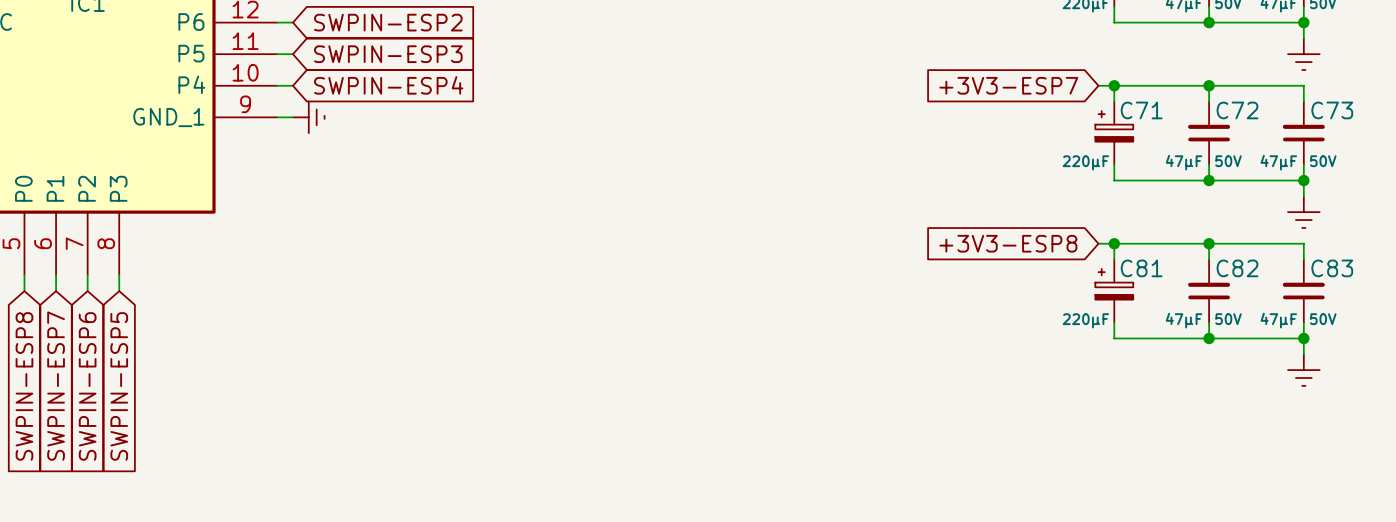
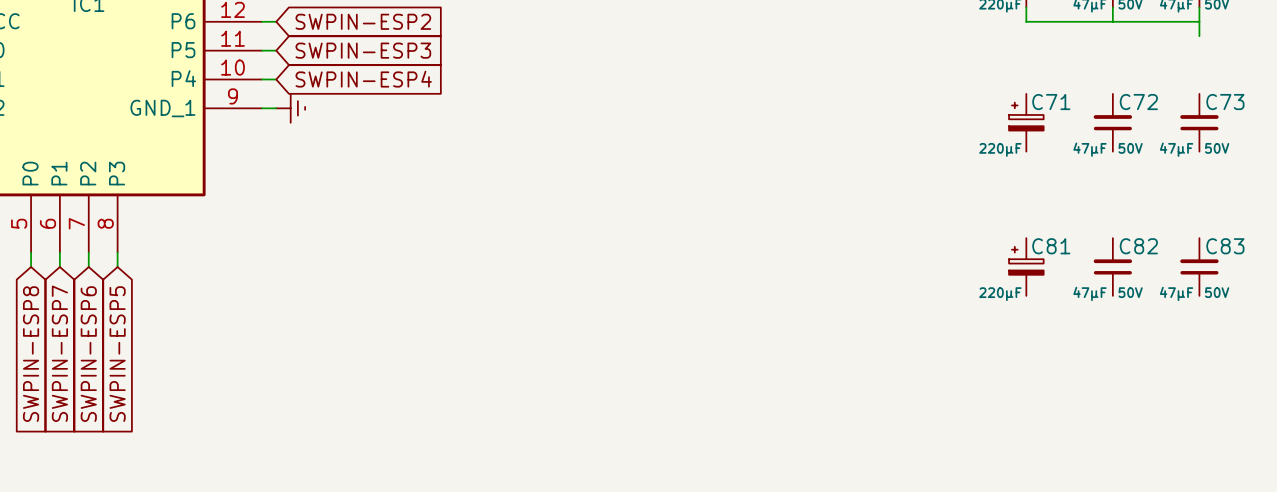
junction: (1209, 22) -> none
junction: (1303, 22) -> none
power symbol: (1303, 54) -> none
global label: +3V3-ESP7 (1008, 85) -> none
wire: (1098, 85) (1303, 85) (1303, 101) -> none
wire: (1114, 85) (1114, 101) -> none
junction: (1114, 85) -> none
wire: (1209, 85) (1209, 101) -> none
junction: (1209, 85) -> none
wire: (1114, 164) (1114, 180) (1303, 180) -> none
wire: (1209, 164) (1209, 180) -> none
wire: (1303, 164) (1303, 196) -> none
junction: (1209, 180) -> none
junction: (1303, 180) -> none
power symbol: (1303, 212) -> none
global label: +3V3-ESP8 (1008, 243) -> none
wire: (1098, 243) (1303, 243) (1303, 259) -> none
wire: (1114, 243) (1114, 259) -> none
junction: (1114, 243) -> none
wire: (1209, 243) (1209, 259) -> none
junction: (1209, 243) -> none
wire: (1114, 322) (1114, 338) (1303, 338) -> none
wire: (1209, 322) (1209, 338) -> none
wire: (1303, 322) (1303, 354) -> none
junction: (1209, 338) -> none
junction: (1303, 338) -> none
power symbol: (1303, 370) -> none

